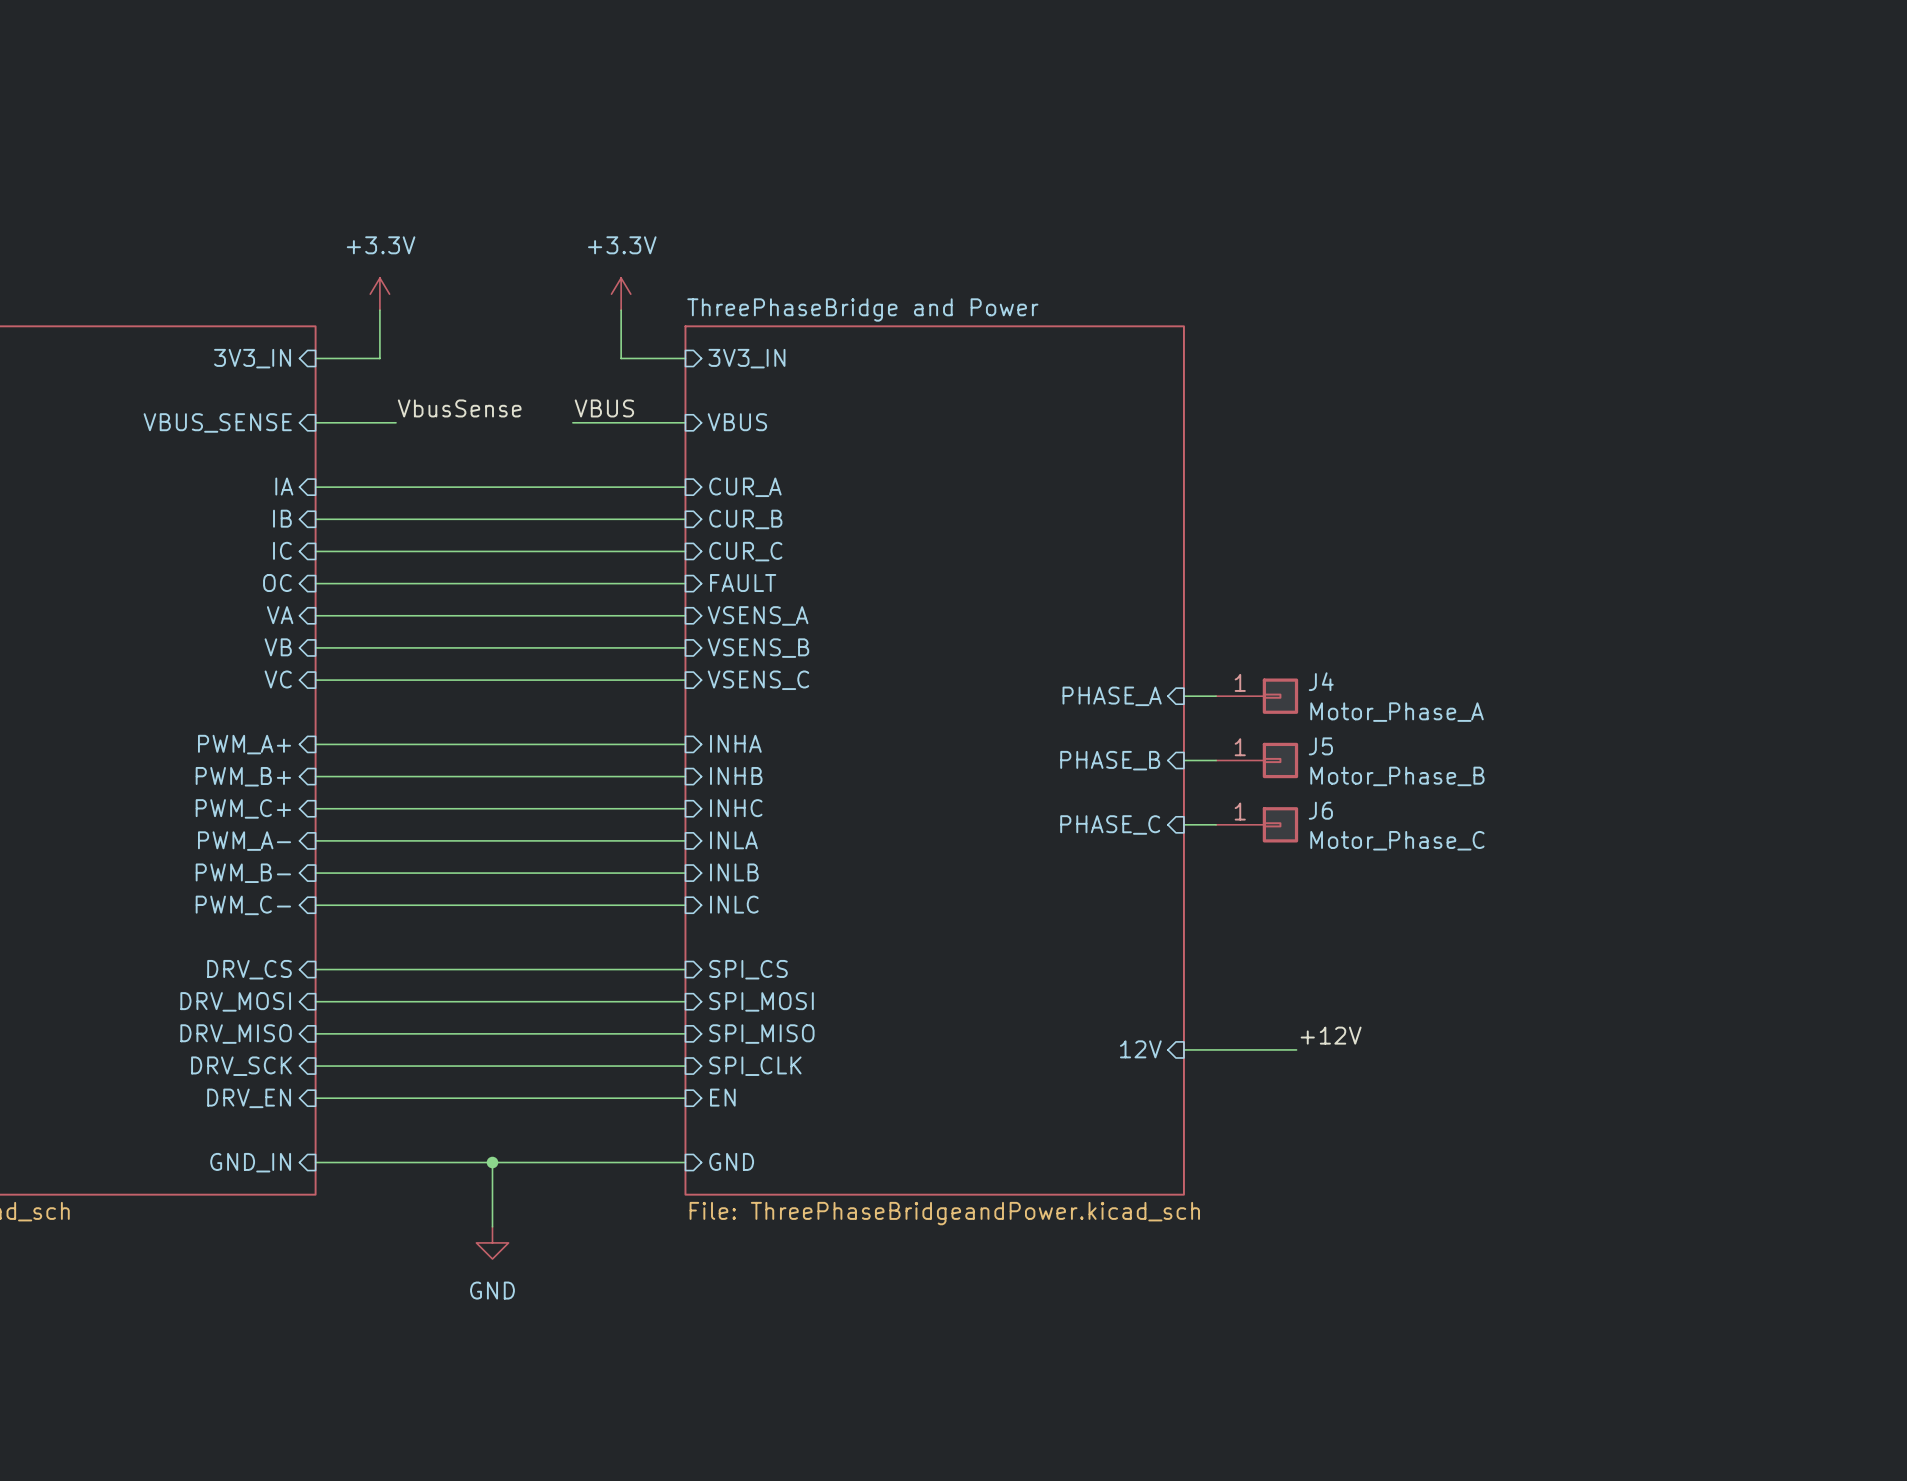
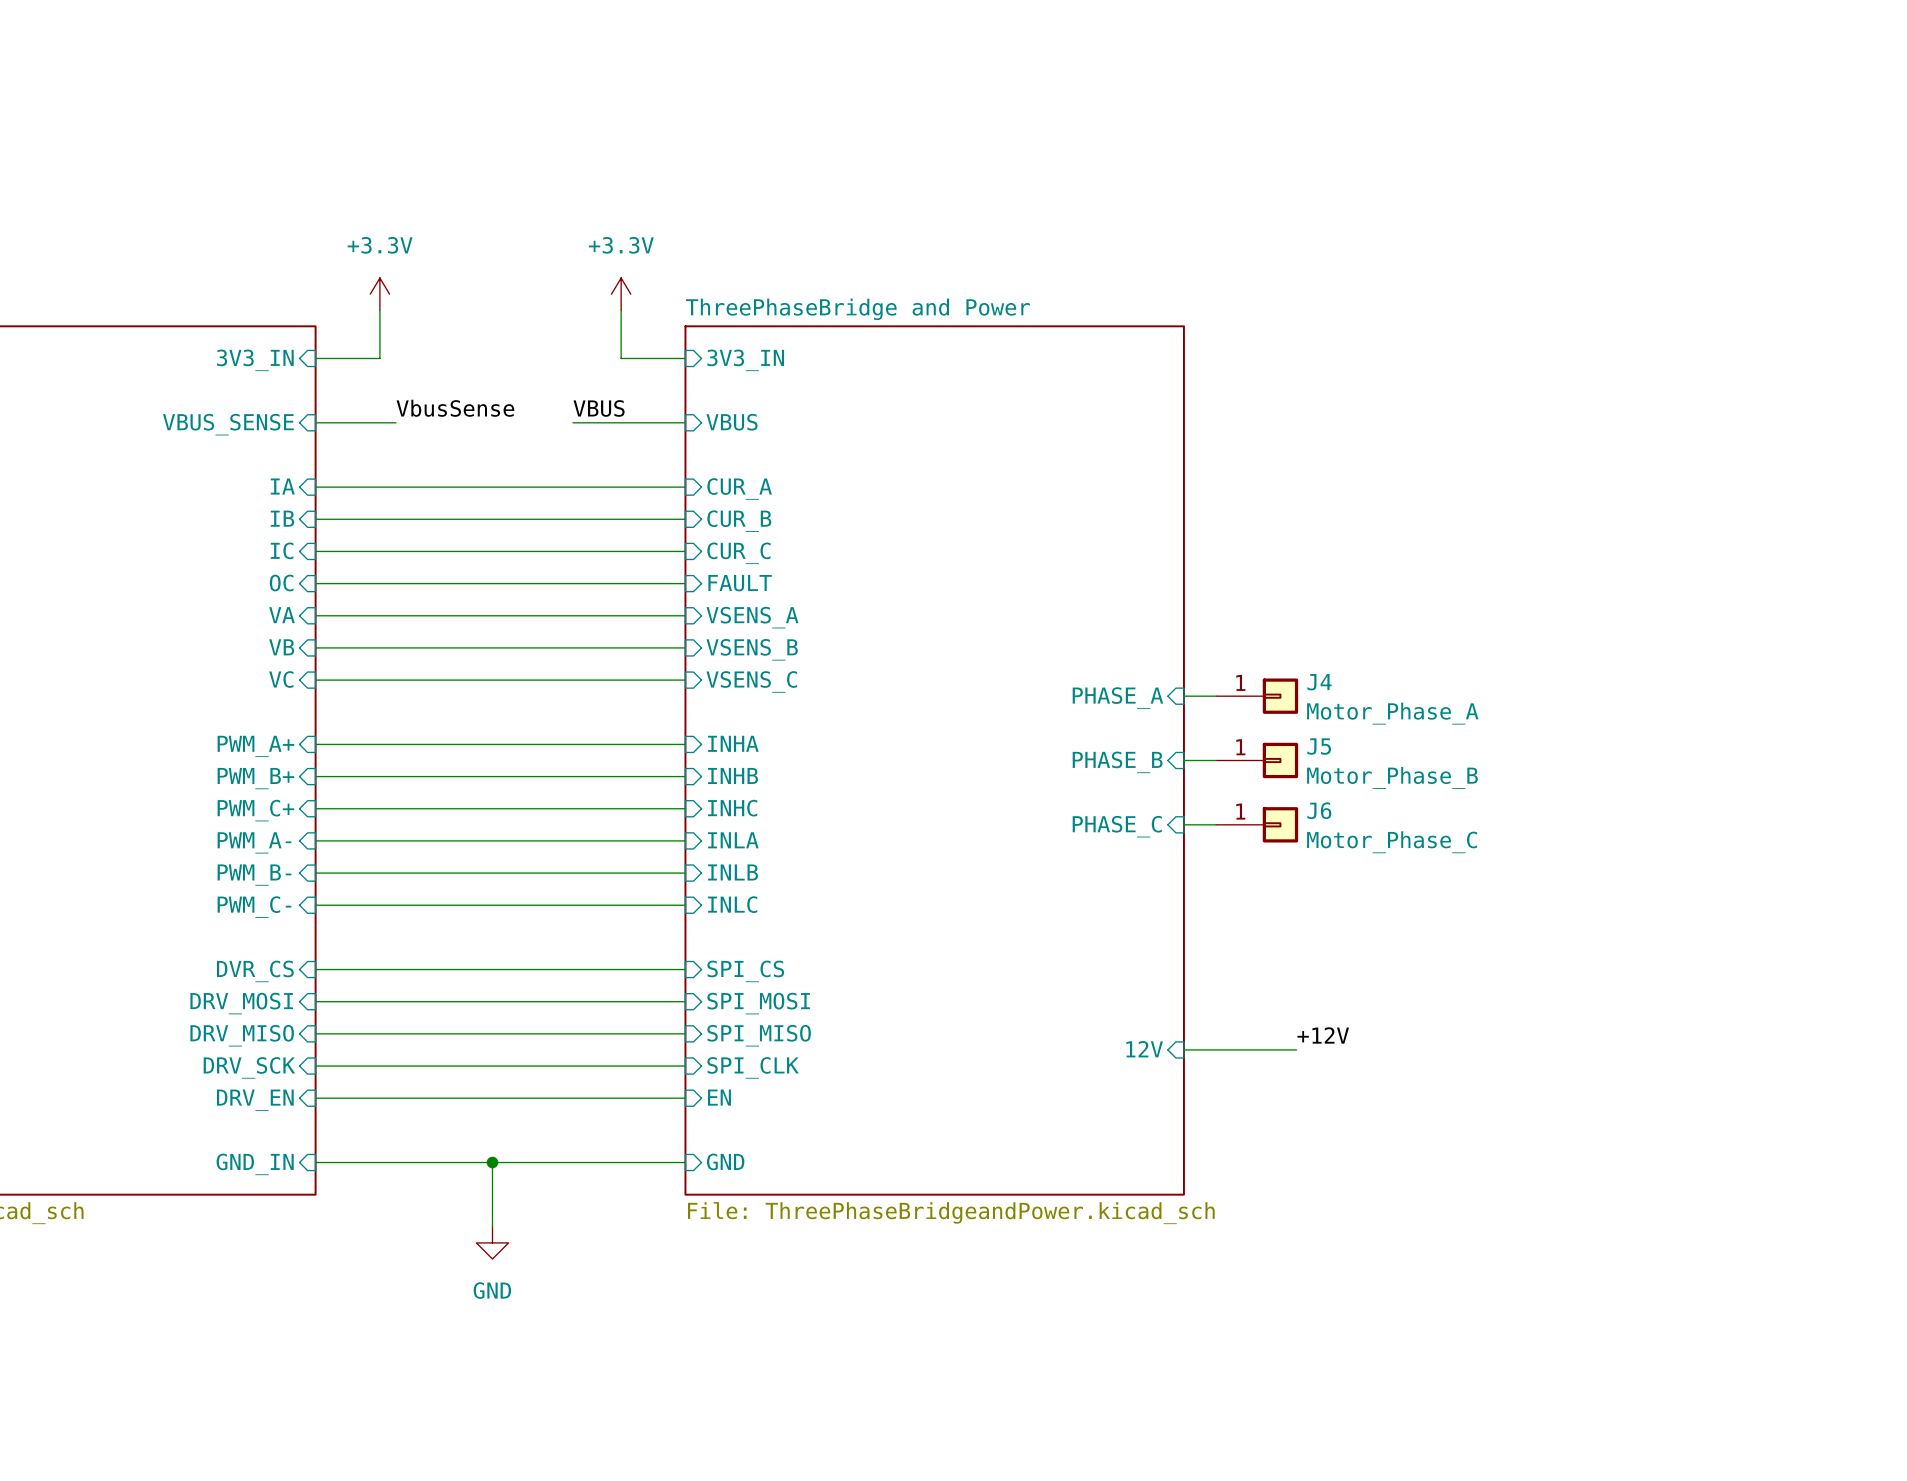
sheet pin: DRV_CS (249, 969) -> DVR_CS (255, 971)

